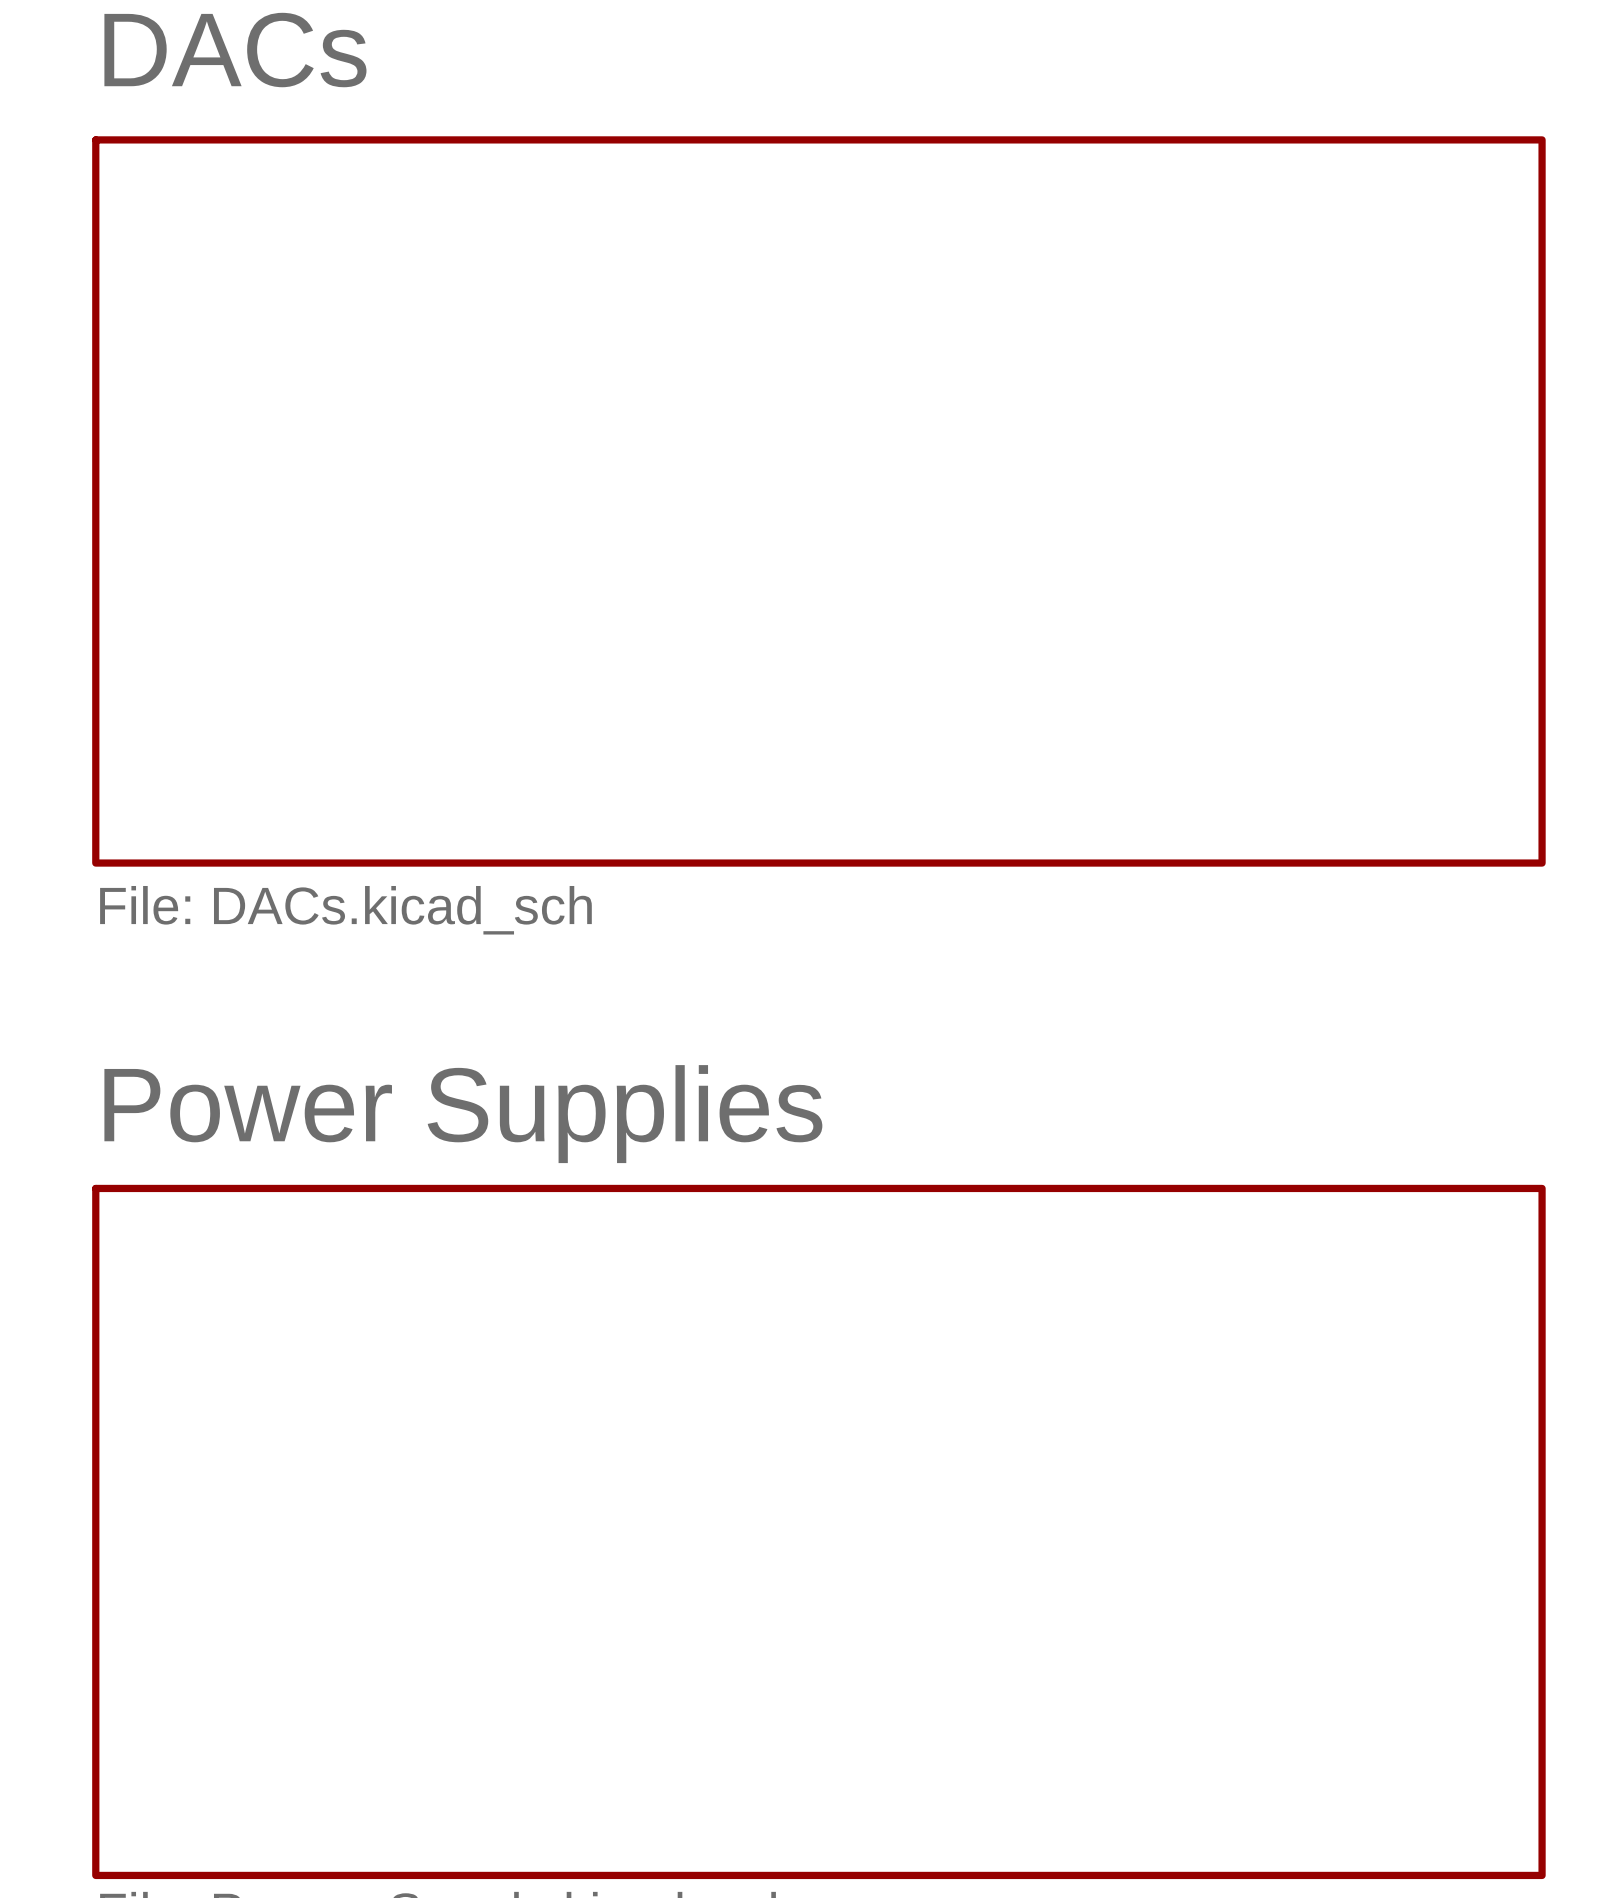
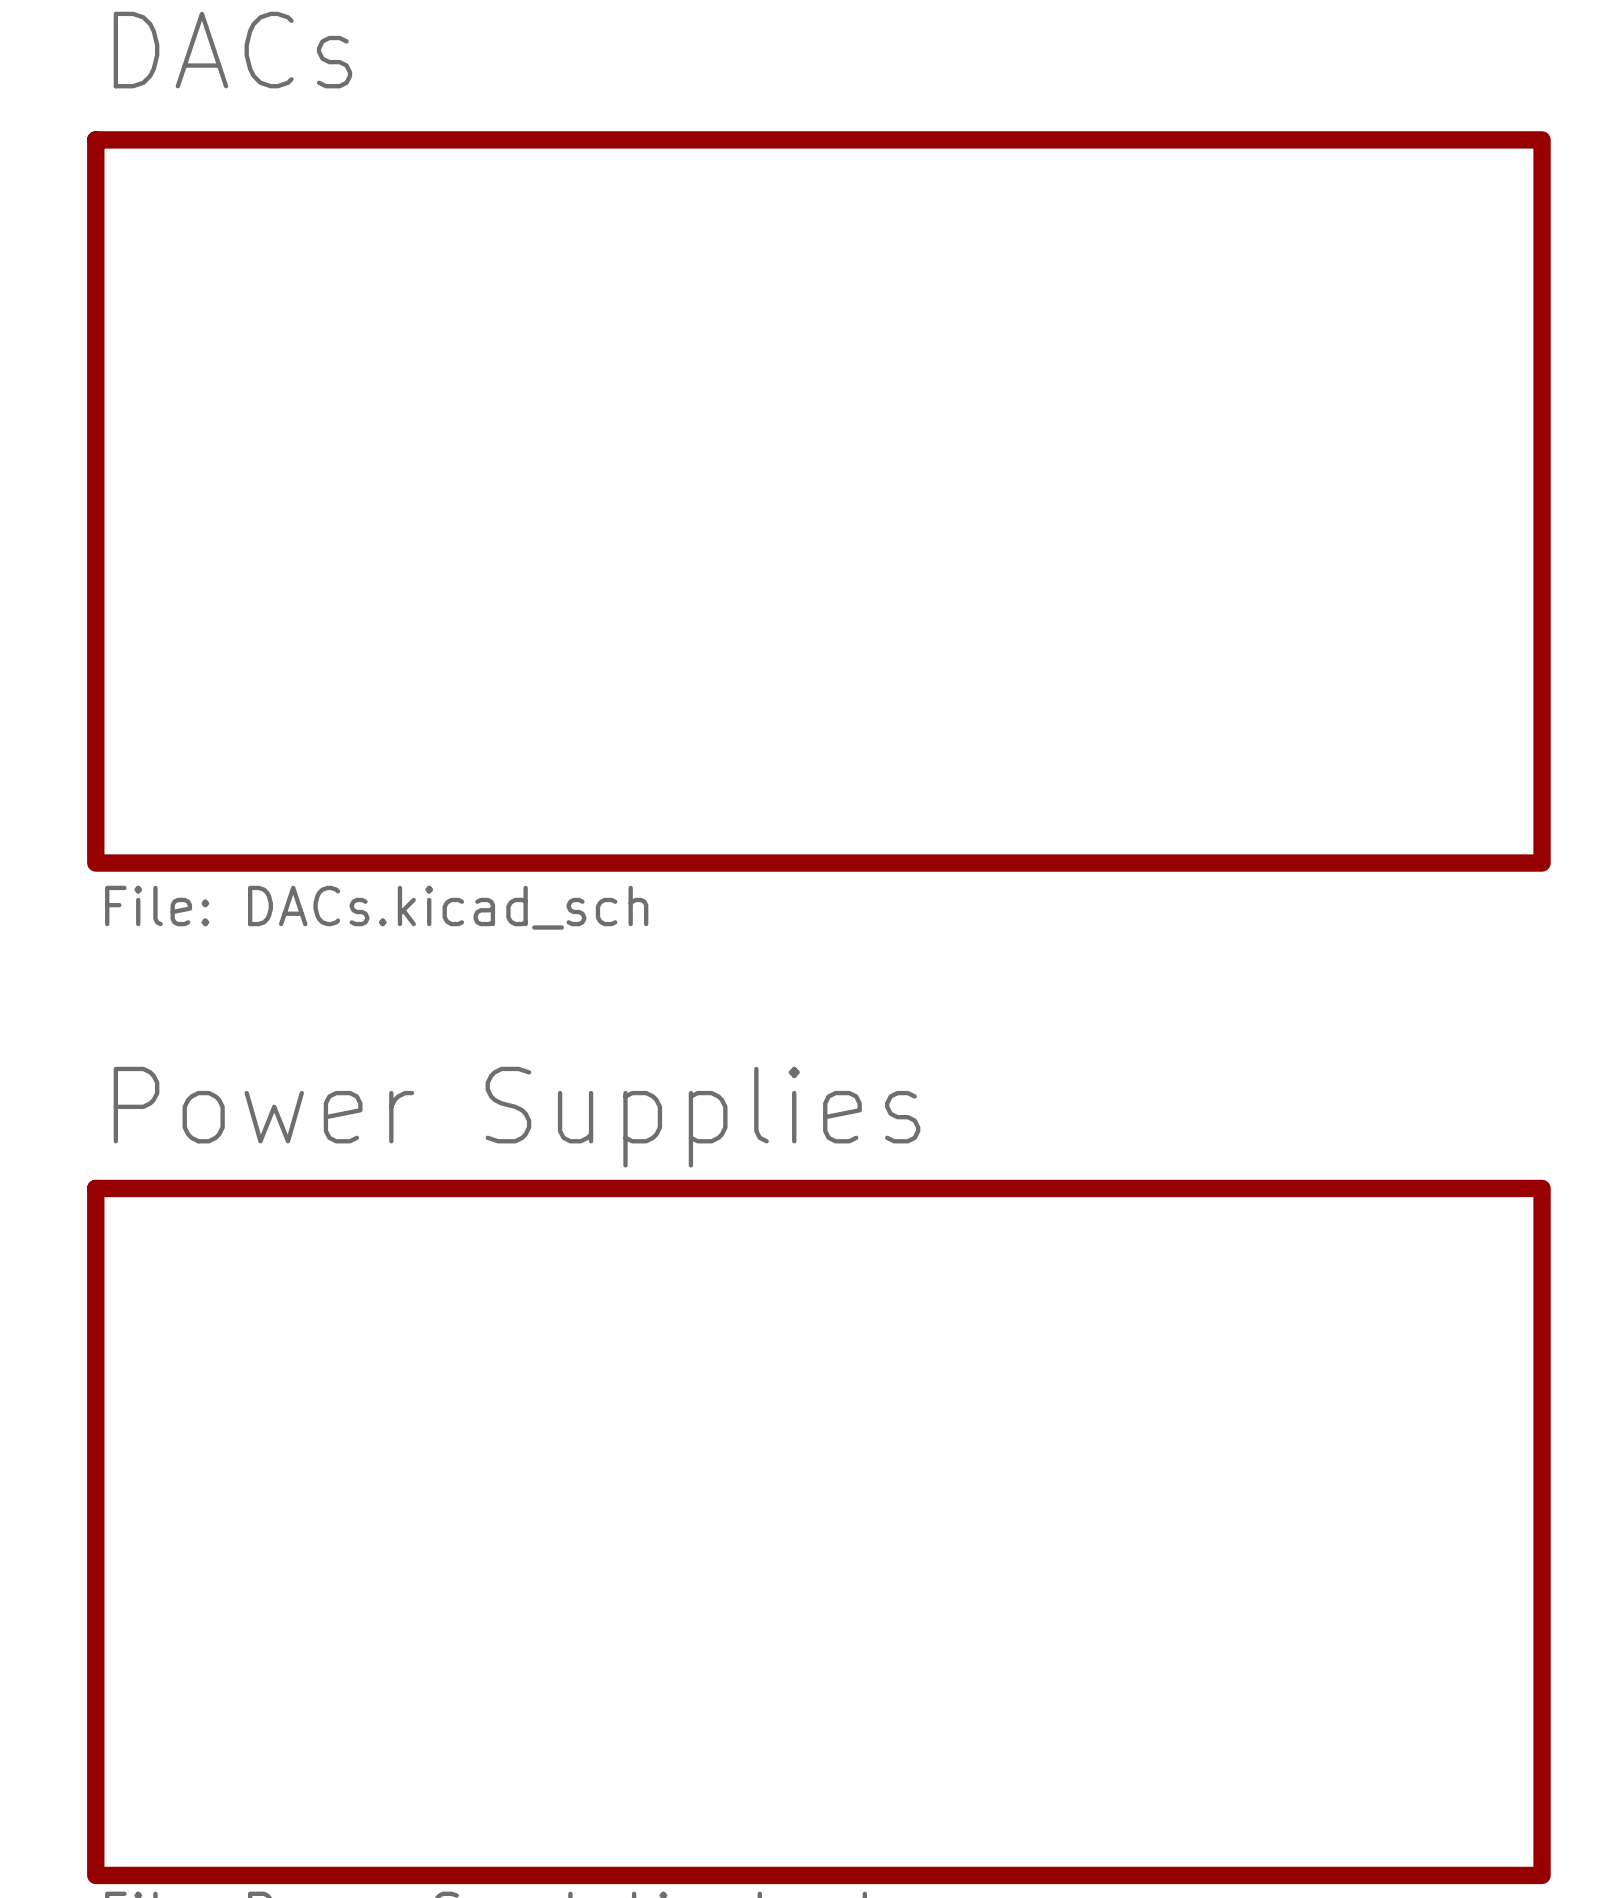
sheet DACs shape: [92, 136, 1546, 867] -> [87, 131, 1551, 872]
sheet Power Supplies shape: [92, 1184, 1546, 1880] -> [87, 1179, 1551, 1885]

